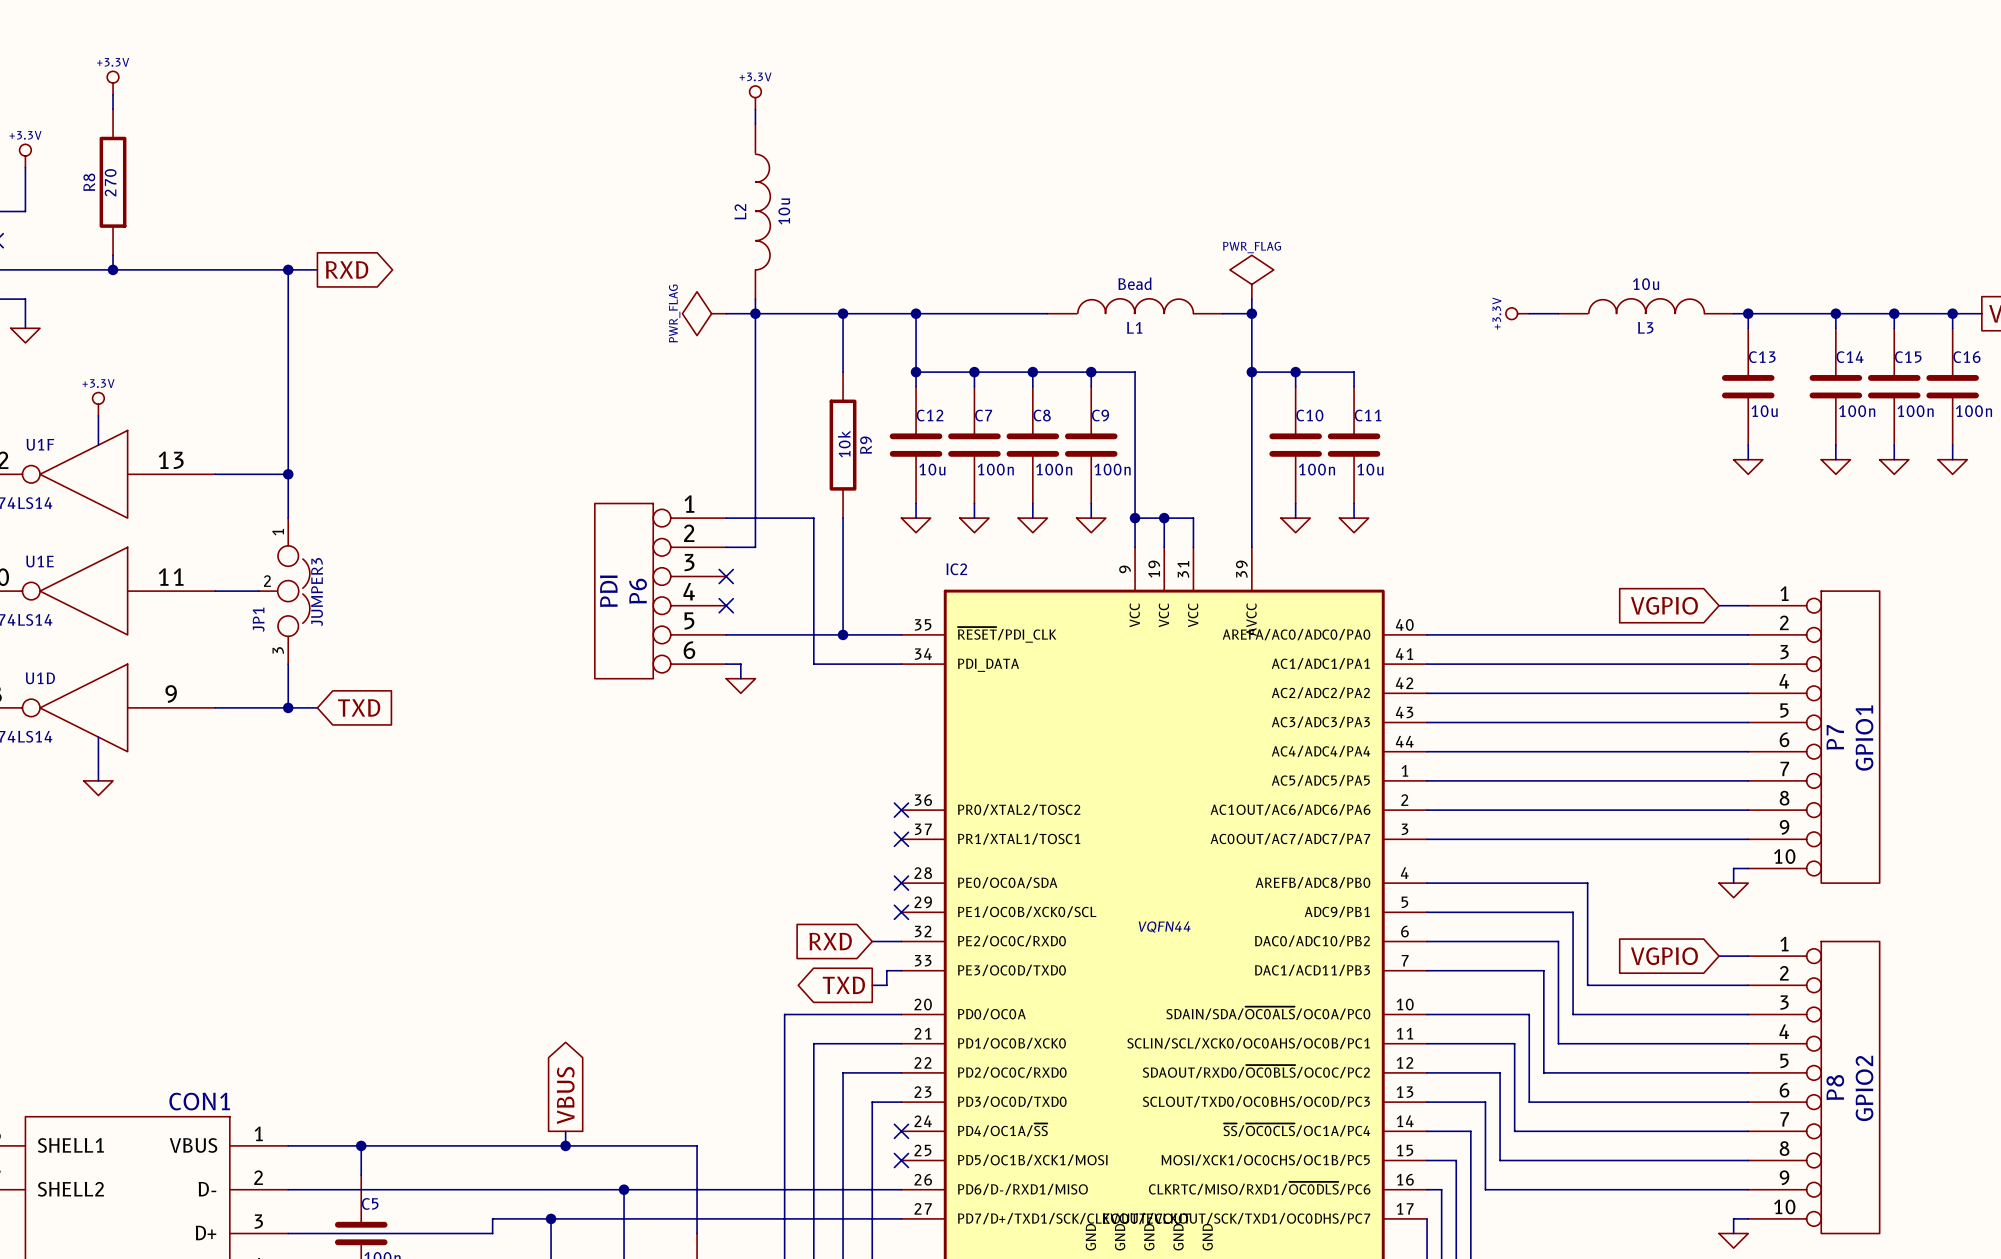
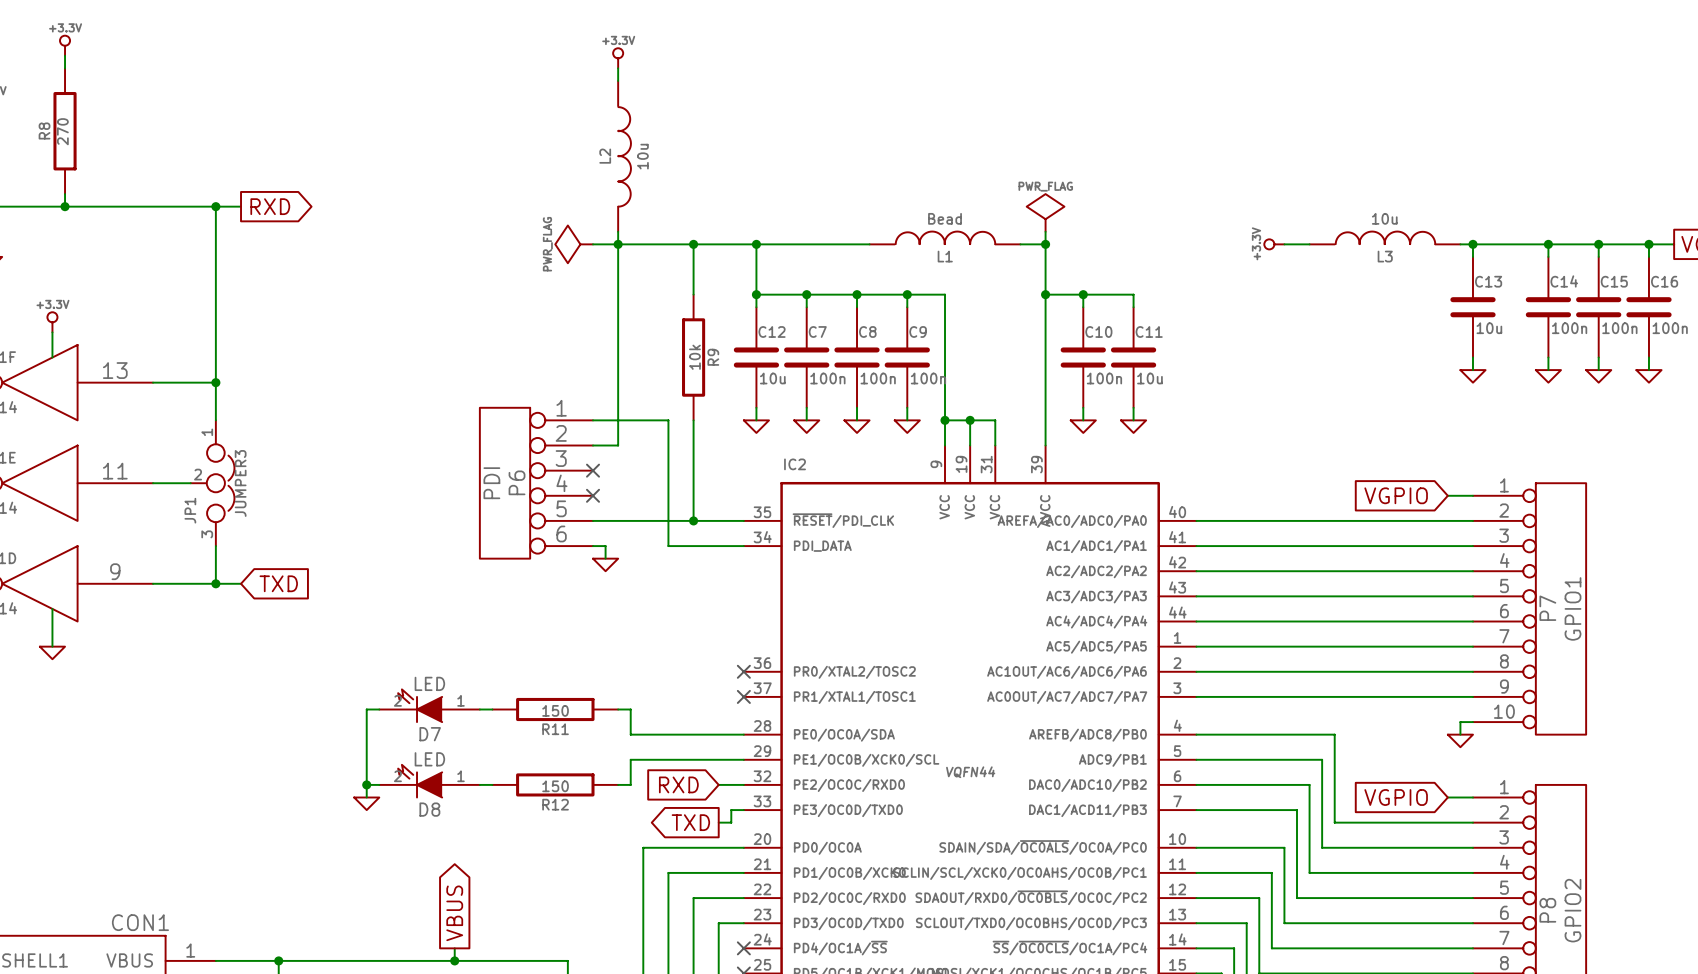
D7: none -> LED (429, 705)
wire: none -> (379, 709) (366, 709) (366, 797)
wire: none -> (479, 709) (492, 709)
R11: none -> 150 (555, 709)
wire: none -> (618, 709) (630, 709) (630, 734) (743, 734)
no-connect mark: (901, 883) -> none
wire: none -> (743, 759) (630, 759) (630, 784) (618, 784)
no-connect mark: (901, 912) -> none
D8: none -> LED (429, 781)
wire: none -> (366, 784) (379, 784)
junction: none -> (366, 784)
wire: none -> (479, 784) (492, 784)
R12: none -> 150 (555, 784)
power symbol: none -> (366, 803)

